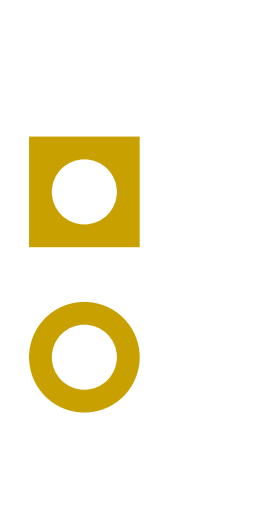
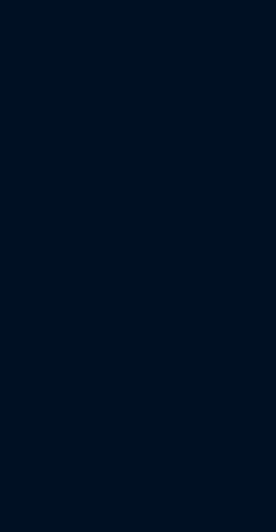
part: (84, 274) -> none

